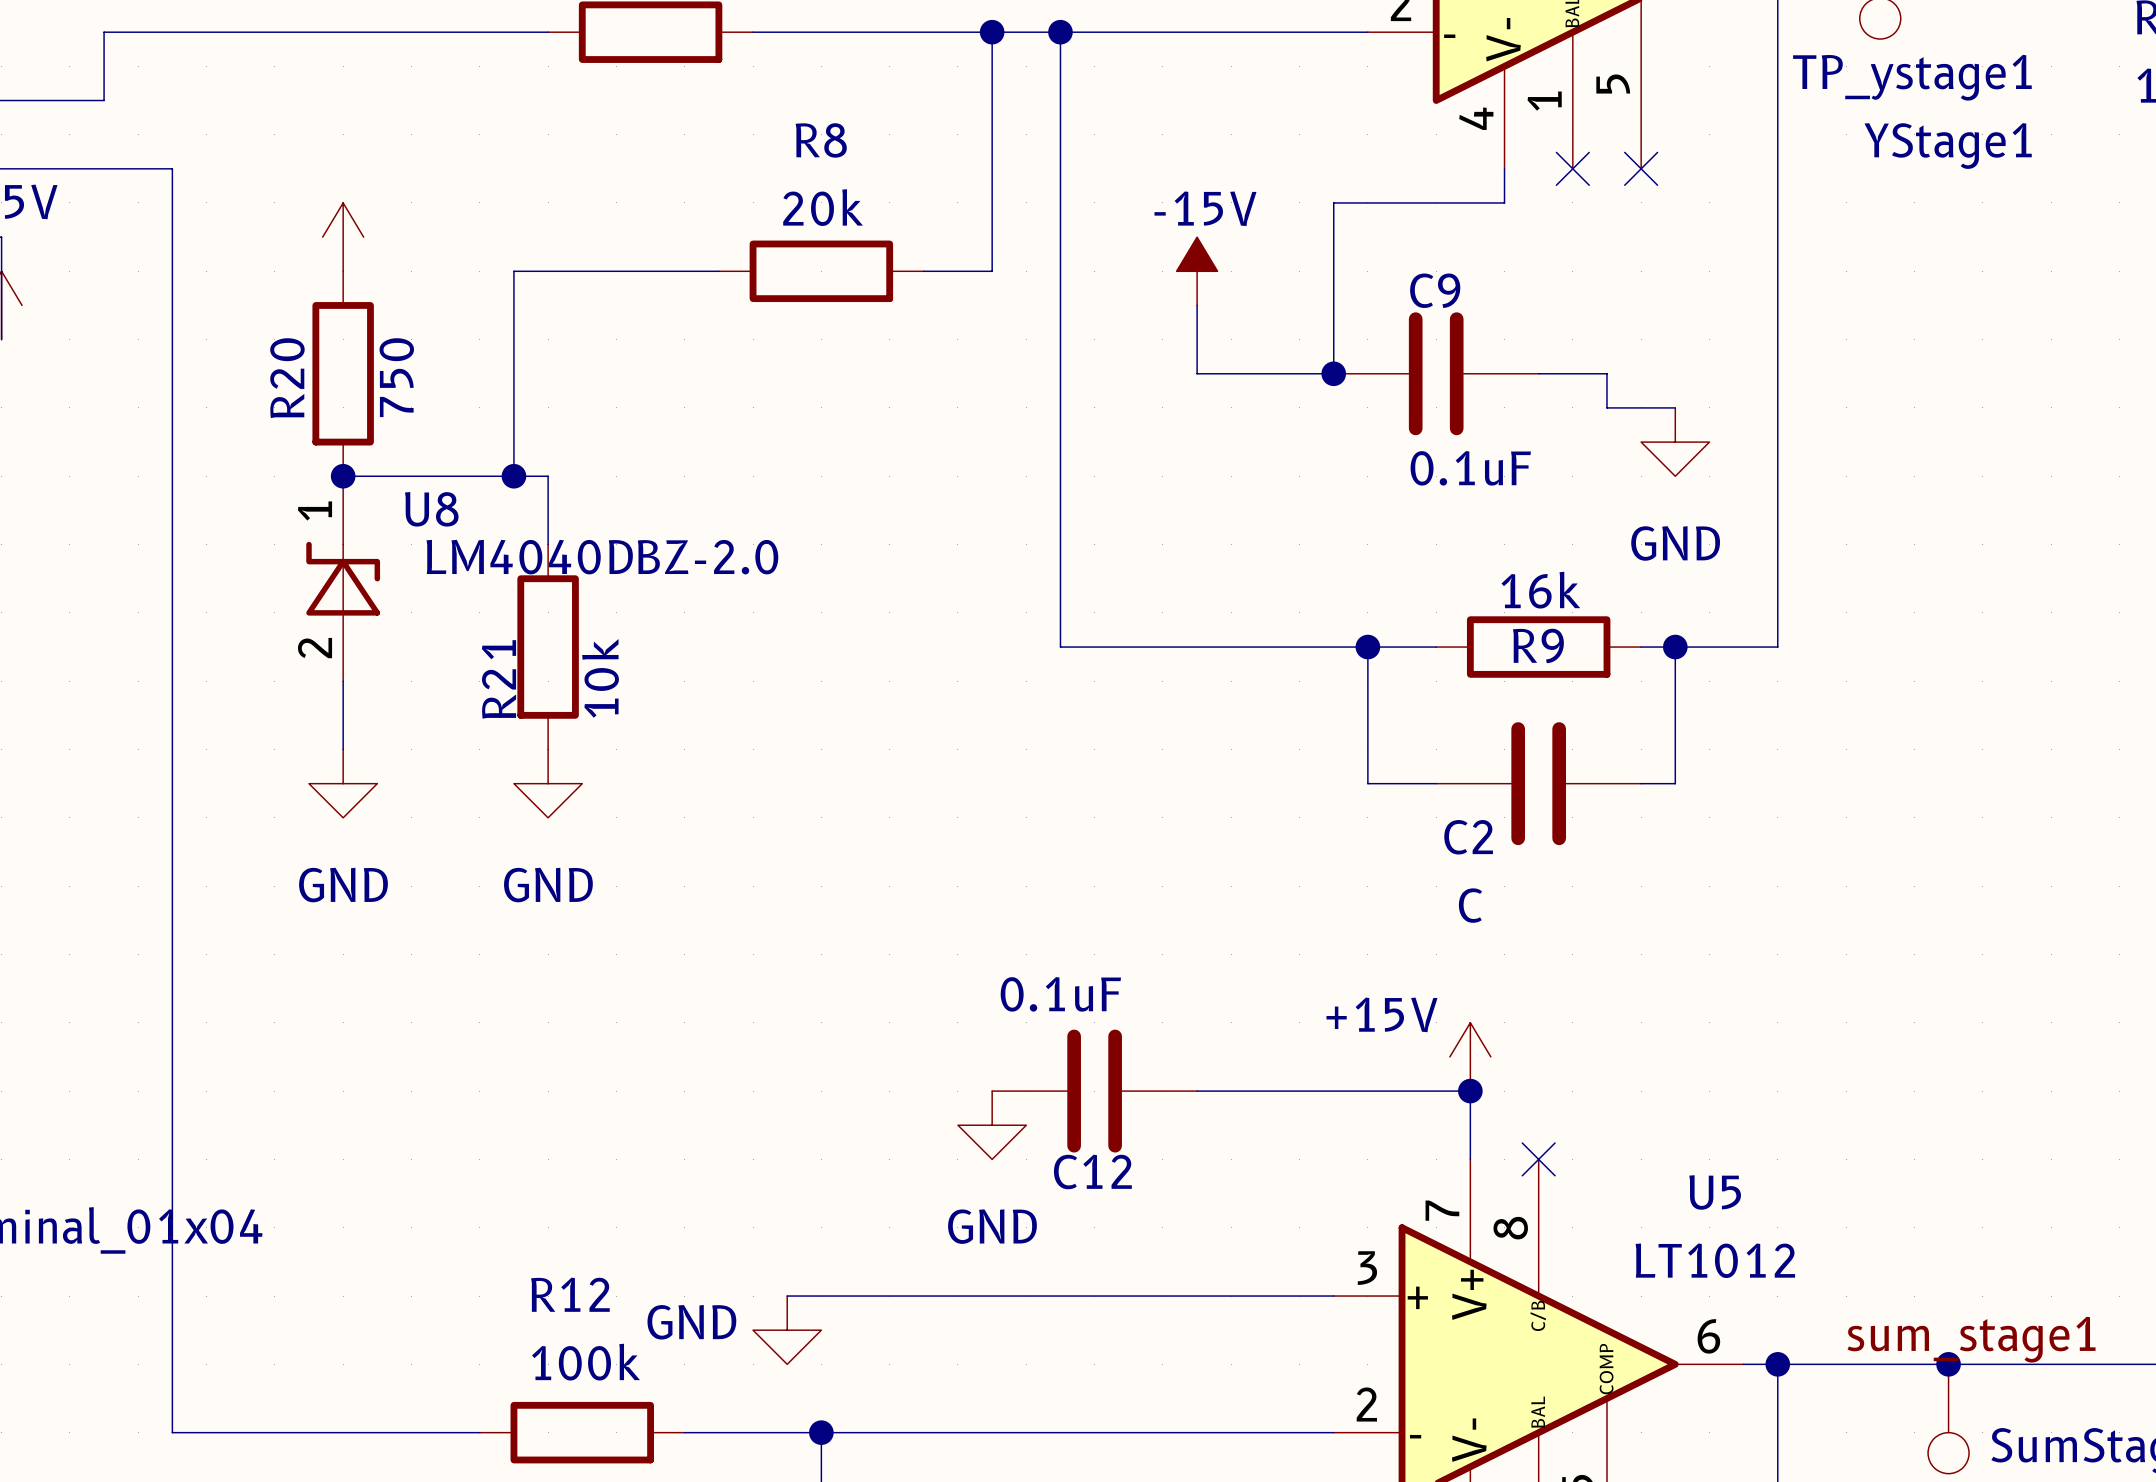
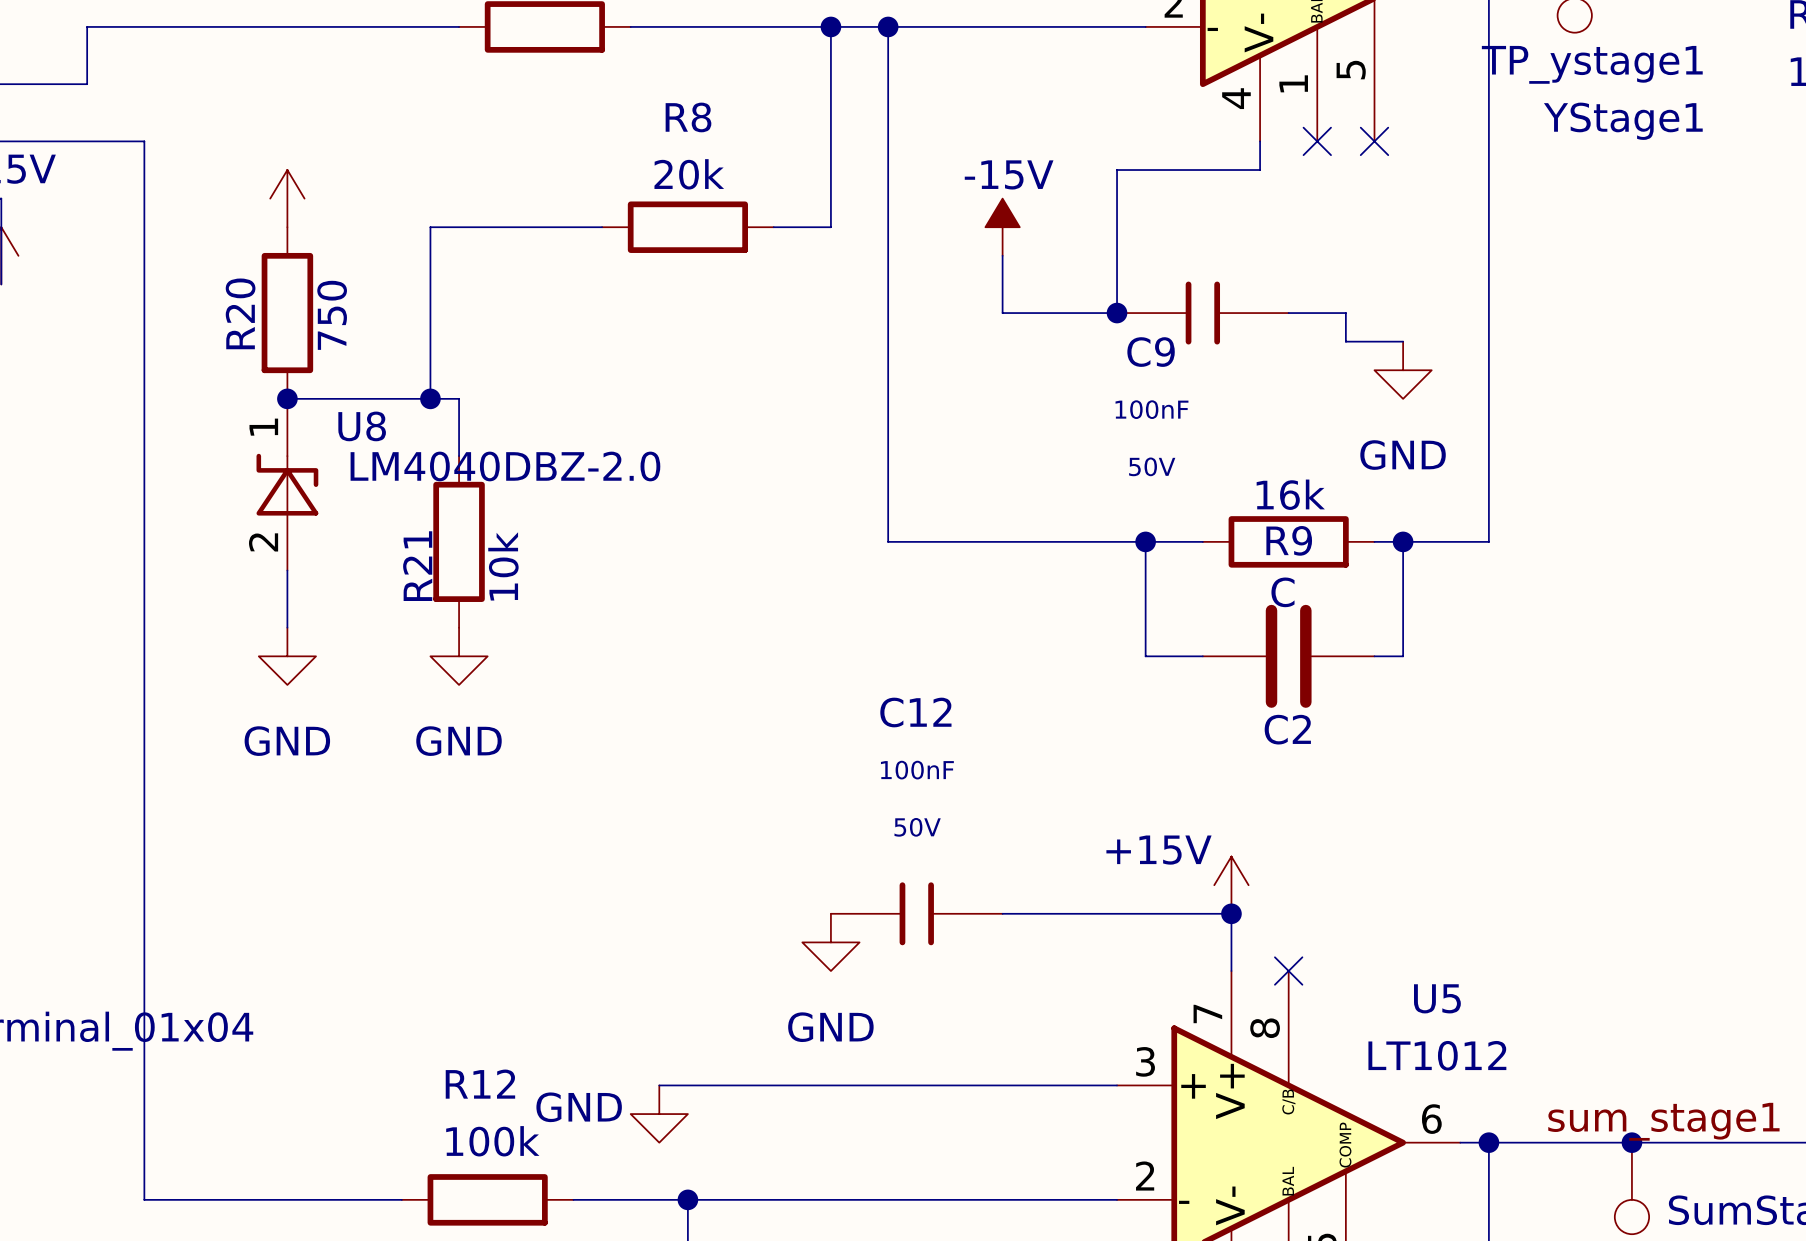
C9 name position: C9 (1435, 290) -> C9 (1151, 352)
C9 symbol: [1333, 312, 1539, 436] -> [1117, 281, 1289, 345]
C9 value: 0.1uF (1470, 468) -> 100nF (1151, 409)
C9 text: none -> 50V (1152, 466)
C2 name position: C2 (1468, 837) -> C2 (1287, 729)
C2 value position: C (1470, 905) -> C (1282, 592)
C12 text: none -> 50V (917, 827)
C12 value: 0.1uF (1060, 994) -> 100nF (917, 770)
C12 symbol: [992, 1029, 1198, 1153] -> [830, 882, 1003, 946]
C12 name position: C12 (1092, 1171) -> C12 (915, 712)

